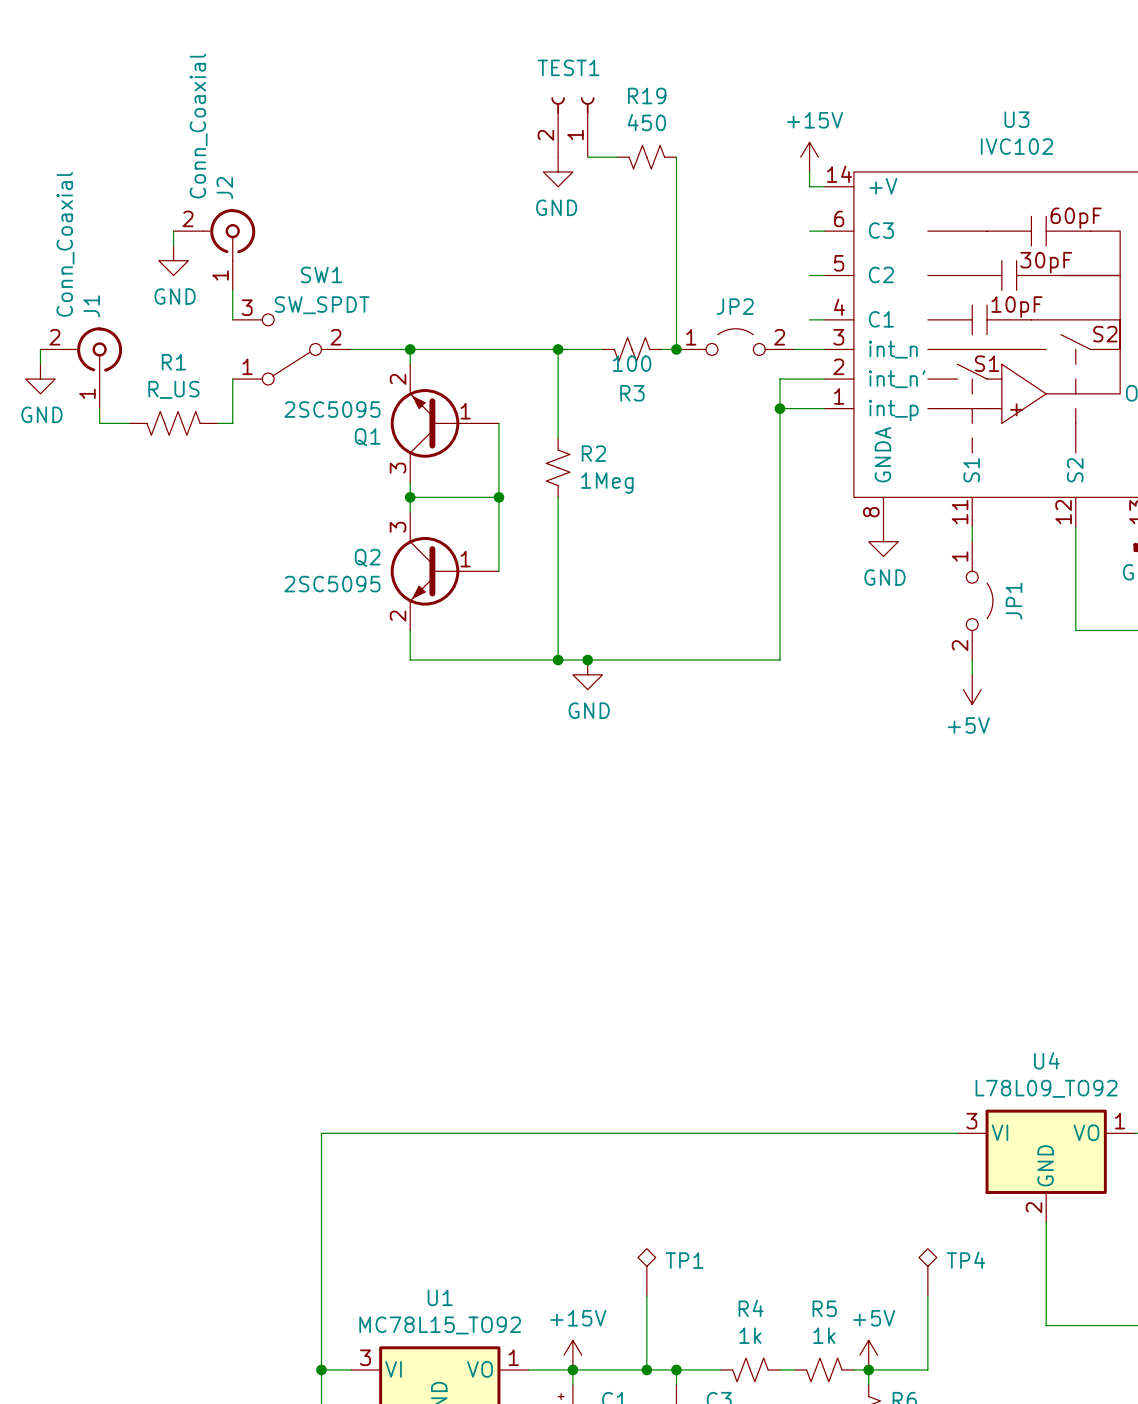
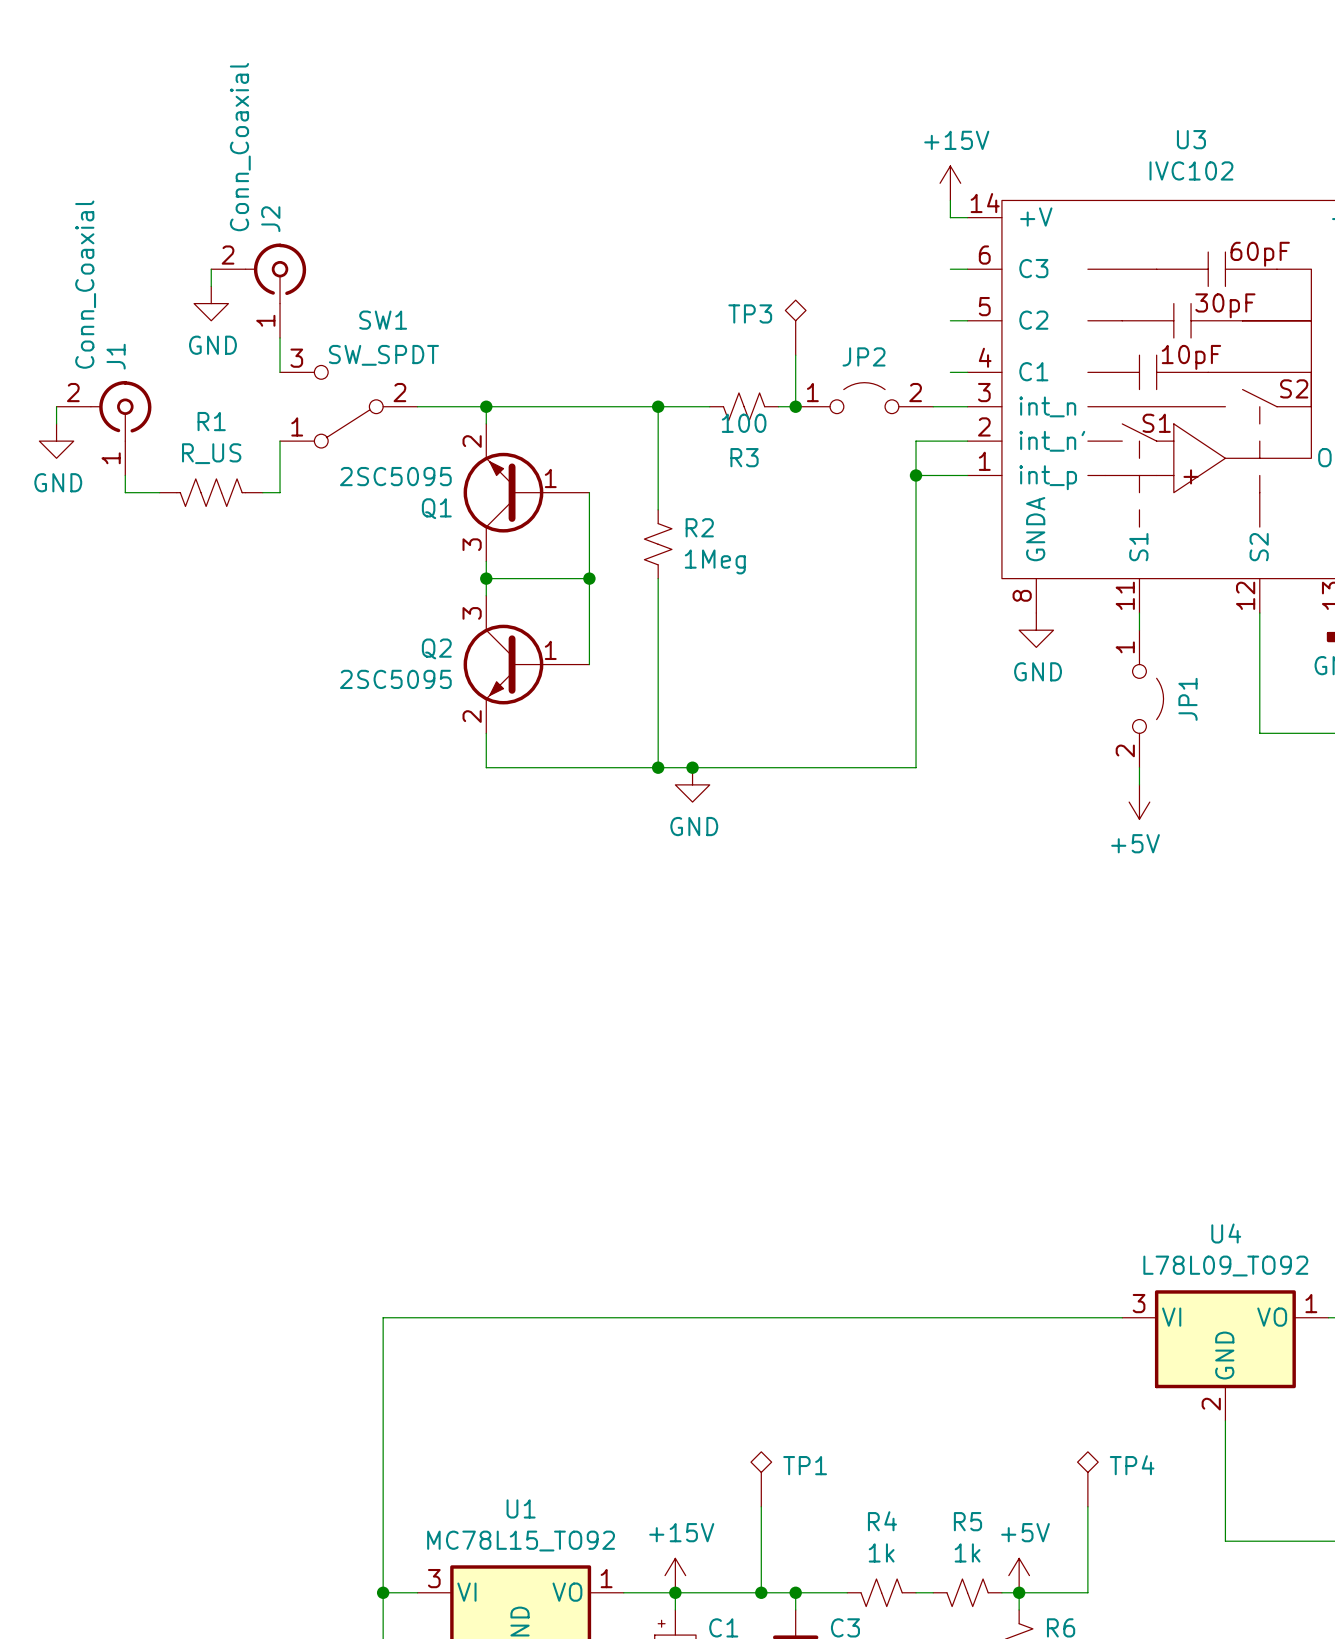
TEST1: (572, 127) -> none
wire: (587, 157) (617, 157) -> none
R19: 450 (646, 157) -> none
wire: (676, 157) (676, 305) -> none
power symbol: GND (558, 171) -> none
TP3: none -> (795, 327)

